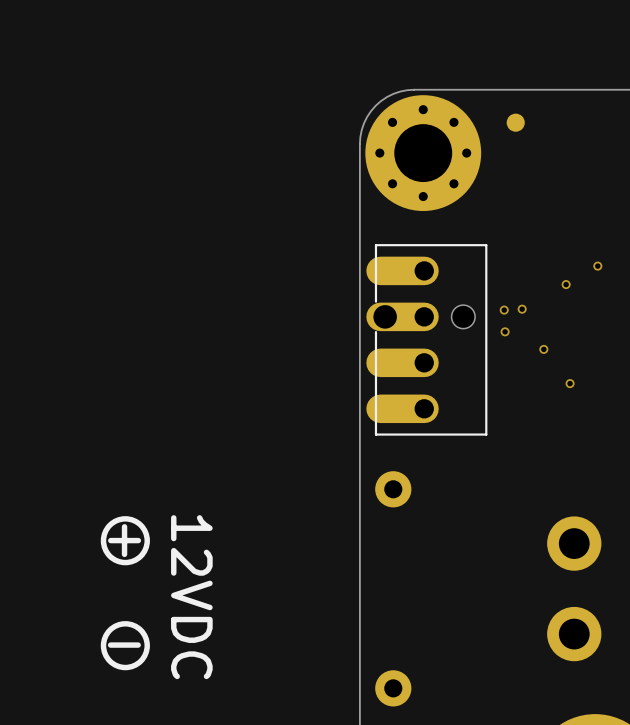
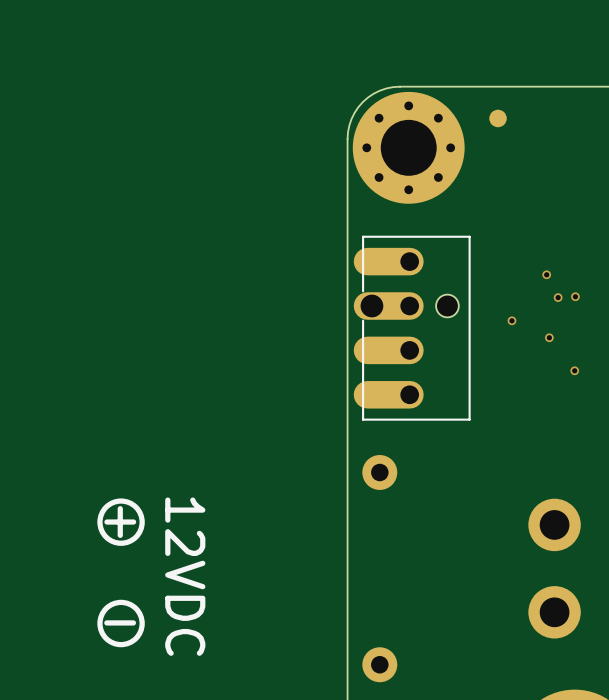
via: (597, 266) -> none
via: none -> (575, 296)
via: none -> (558, 297)
via: (522, 309) -> none
via: (504, 310) -> none
via: (505, 331) -> none
via: none -> (511, 320)
via: (543, 349) -> none
via: none -> (549, 337)
via: (570, 383) -> none
via: none -> (574, 370)

